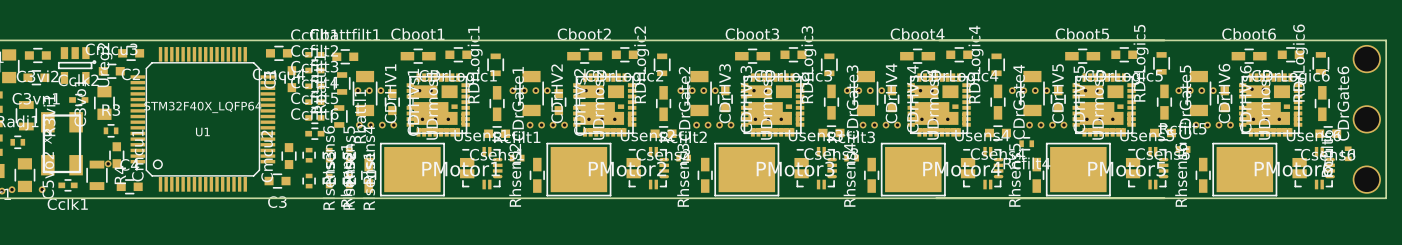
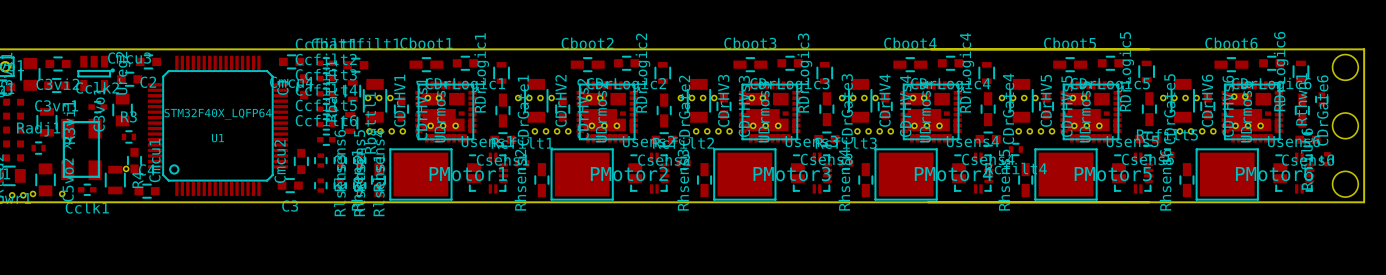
Rthwn1: none -> (1321, 99)

